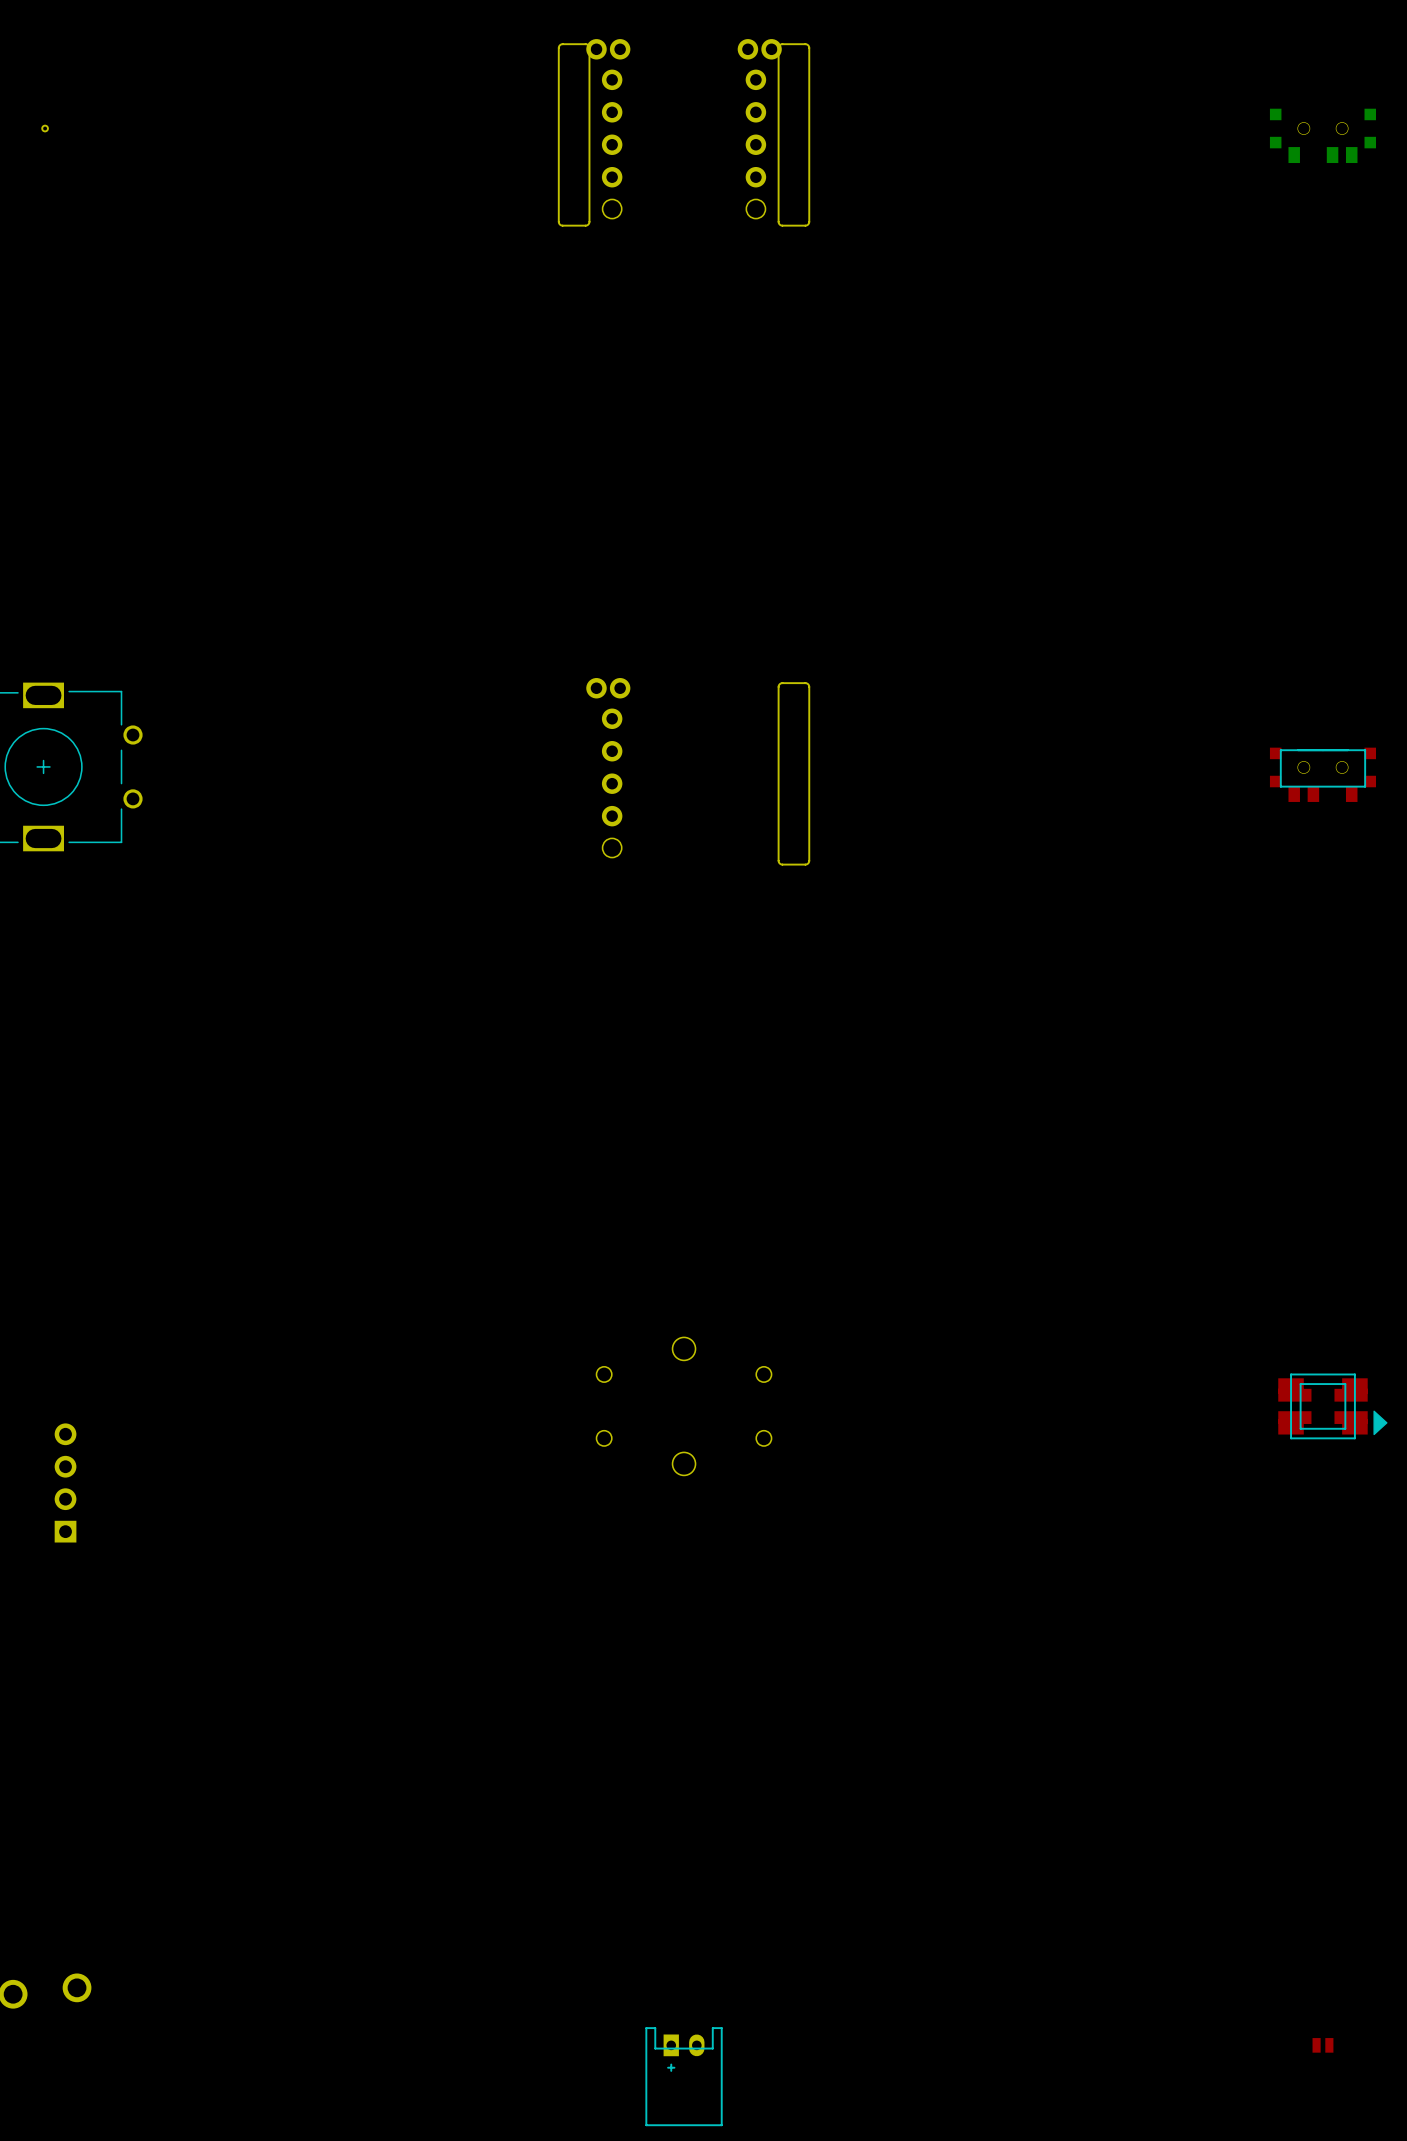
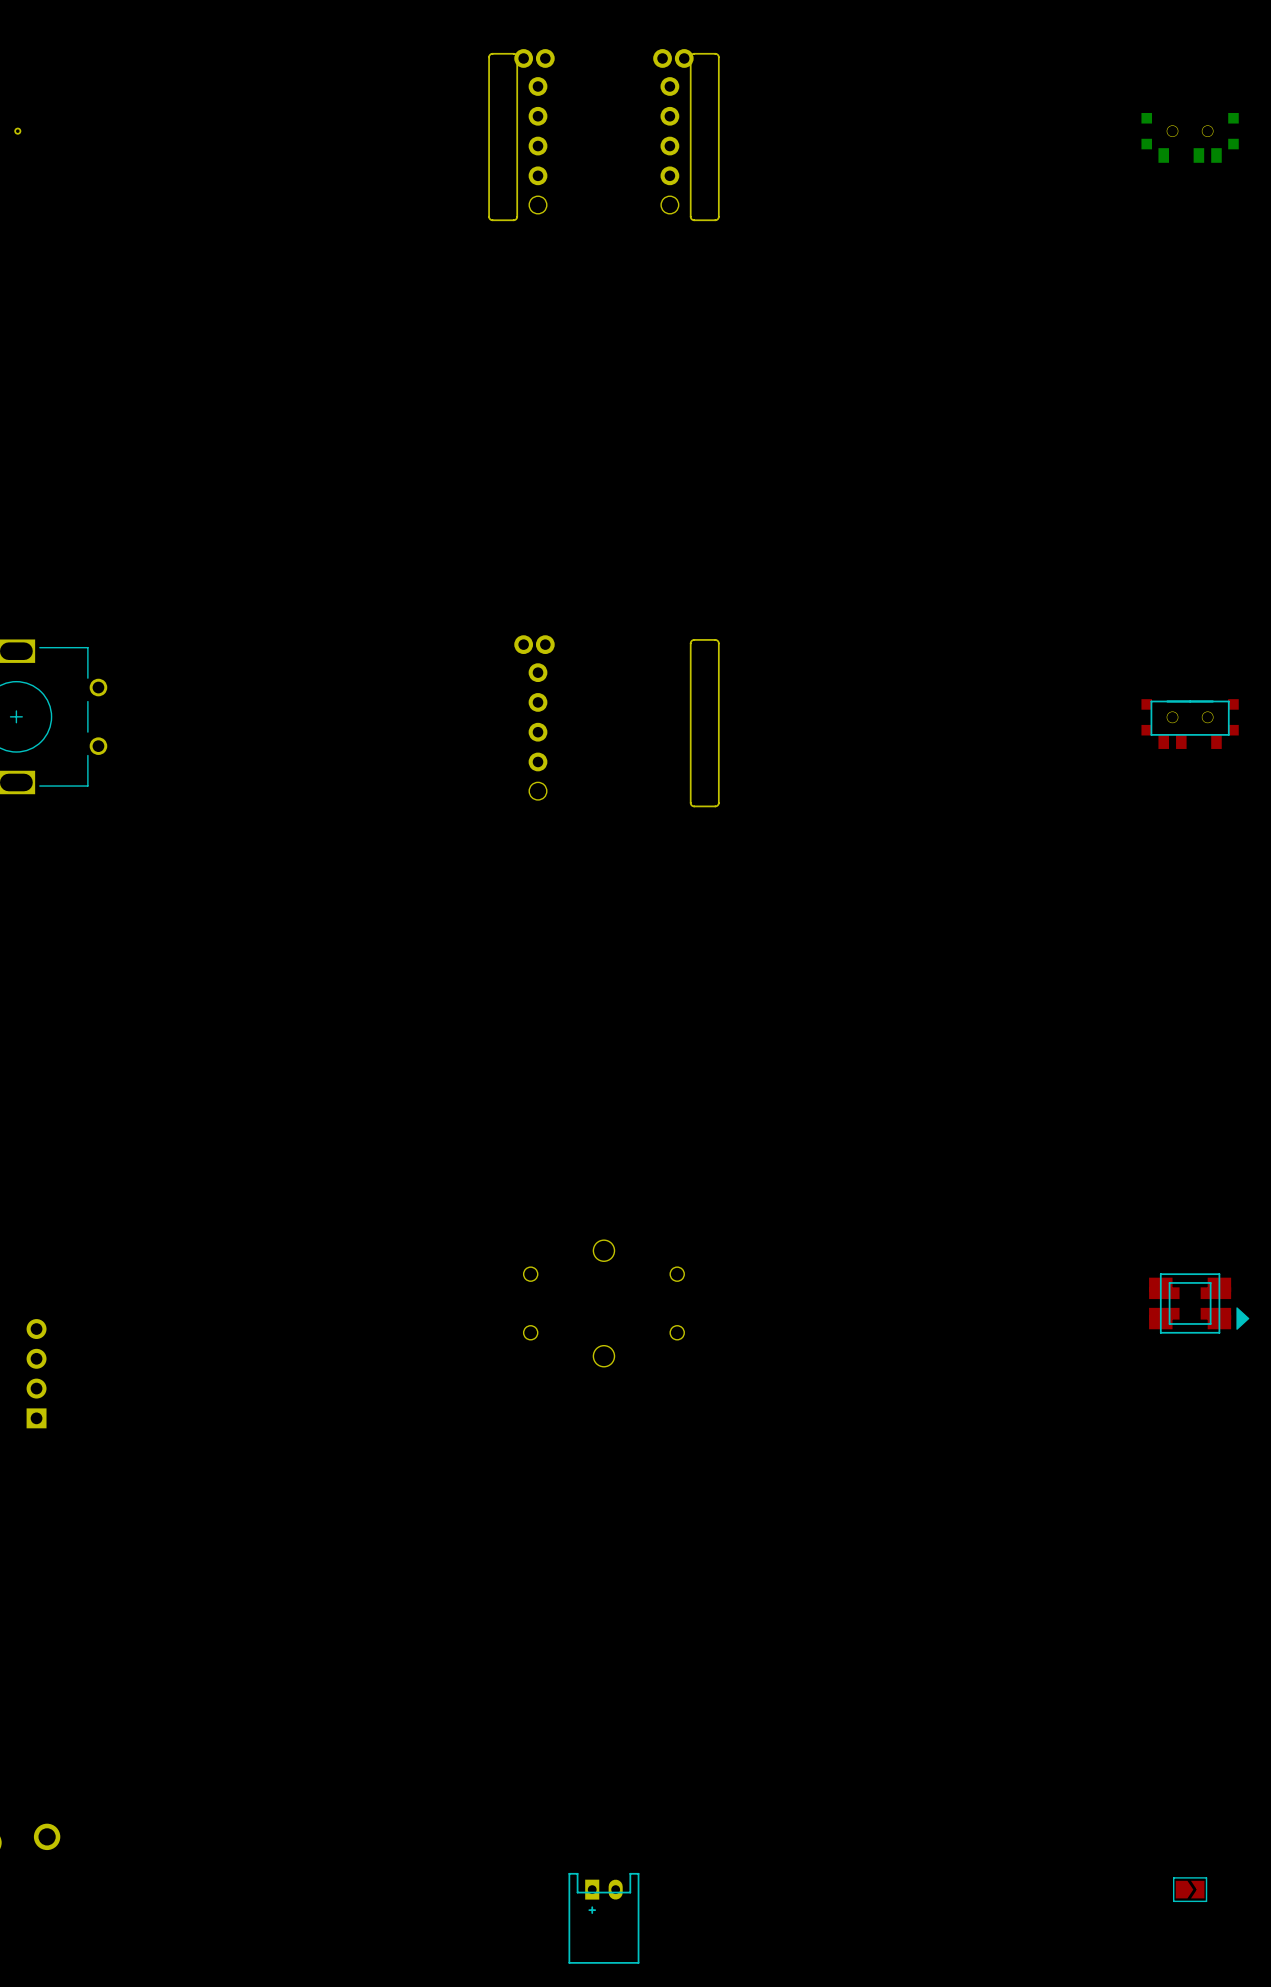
part footprint: [1312, 2038, 1334, 2053] -> [1172, 1877, 1208, 1903]

